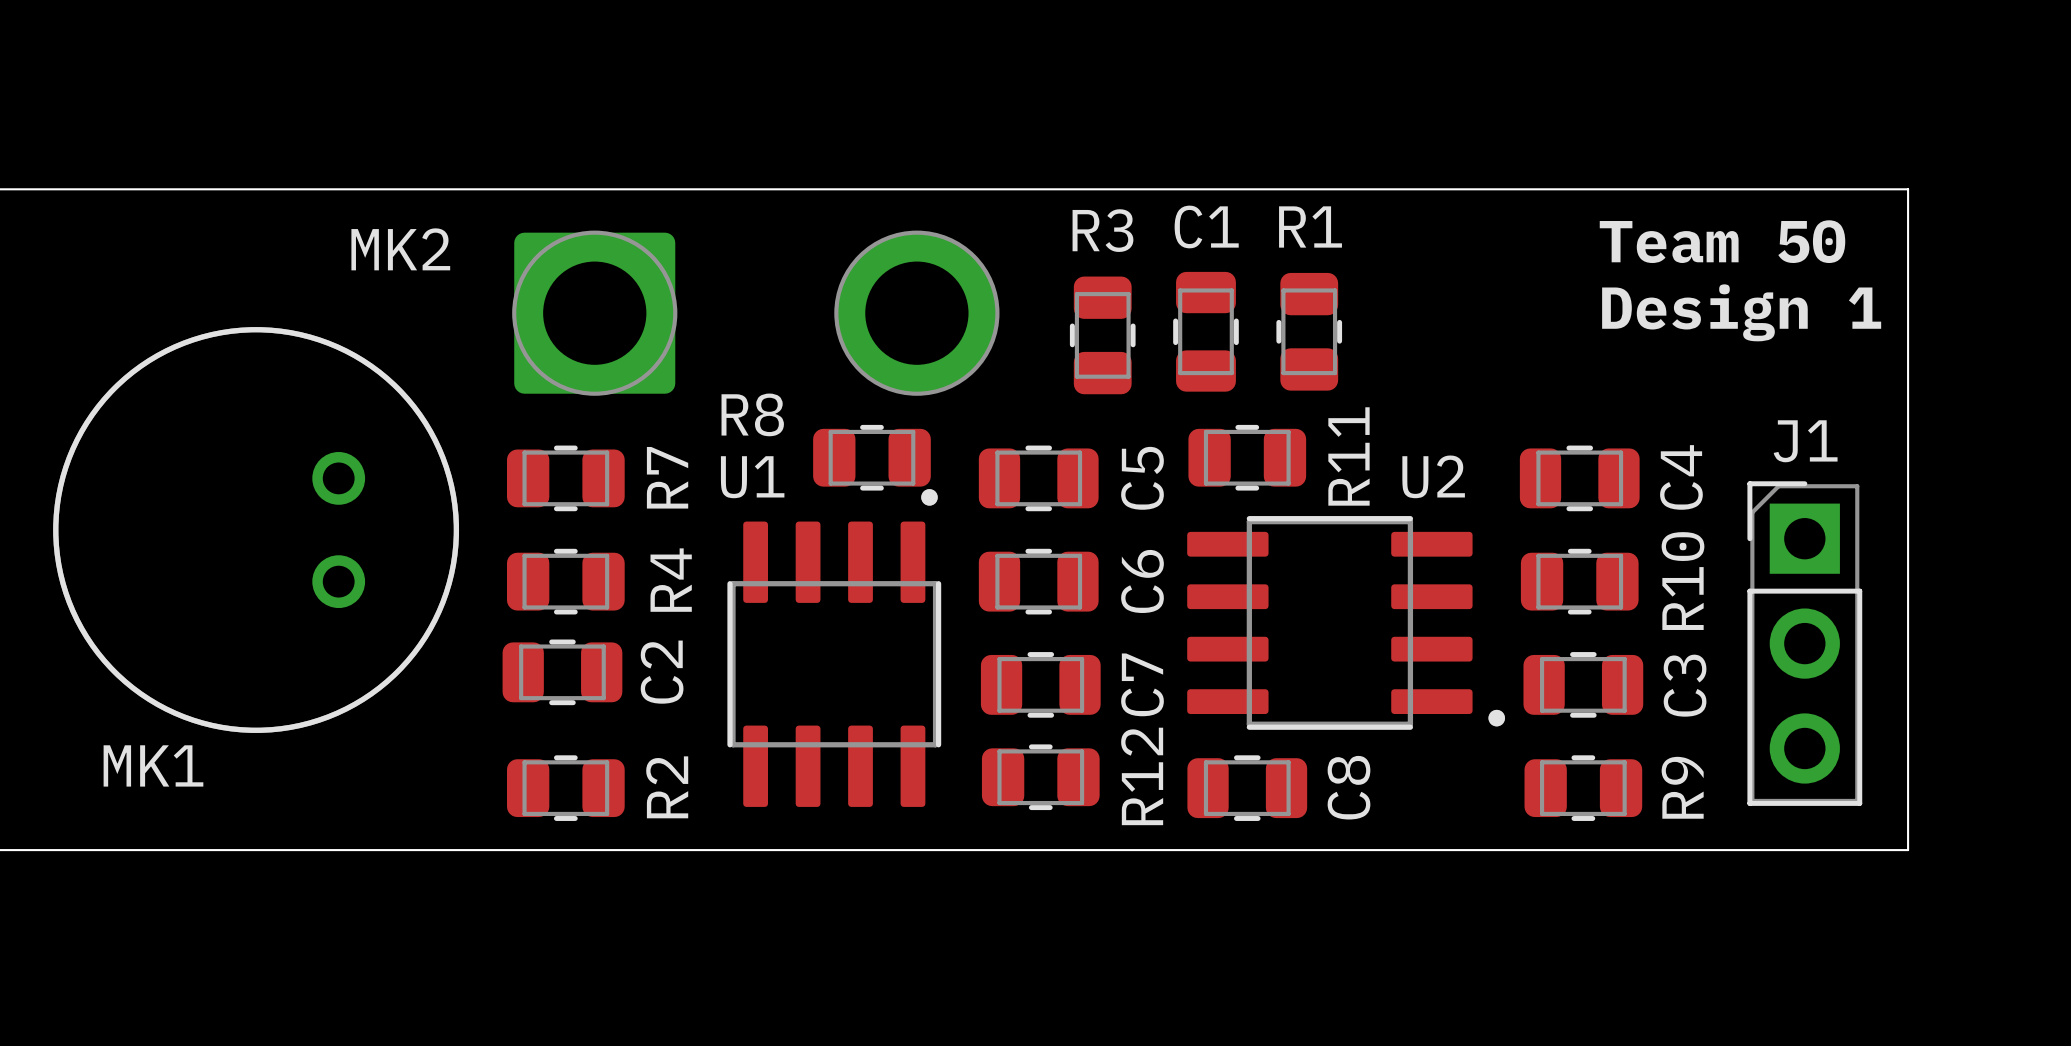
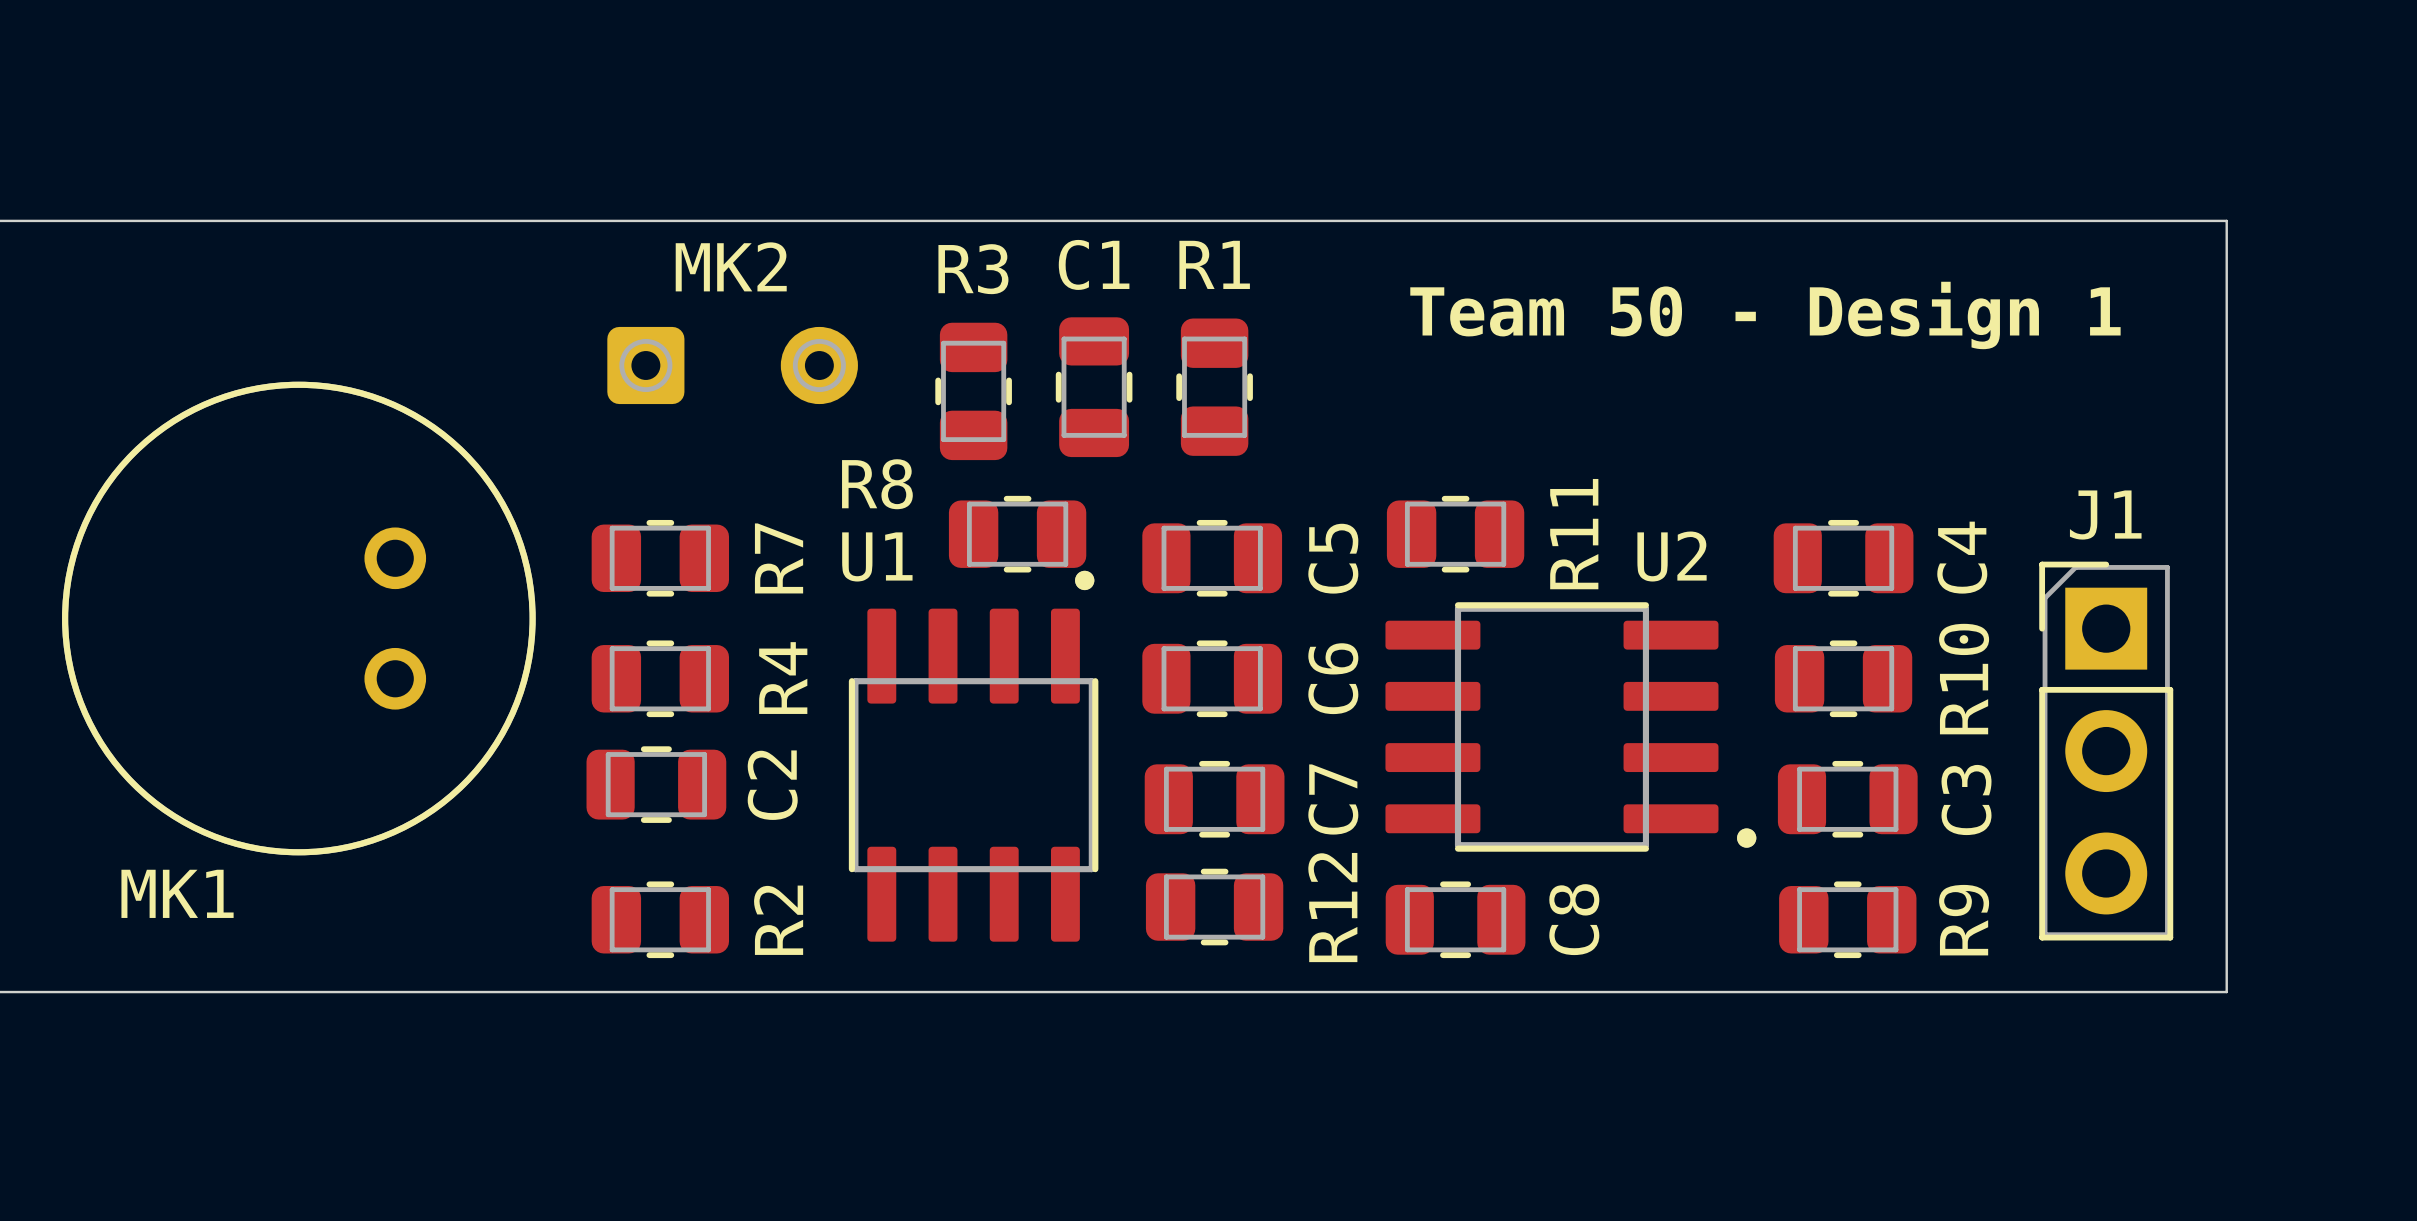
MK2 footprint: [512, 230, 1000, 396] -> [607, 326, 858, 405]
text: Team 50 (1722, 241) -> none
MK2 name position: MK2 (400, 249) -> MK2 (731, 266)
text: Design 1 (1741, 312) -> Team 50 - Design 1 (1765, 315)
C1 position: (1205, 331) -> (1094, 387)
R1 position: (1309, 331) -> (1214, 387)
R3 position: (1102, 335) -> (973, 391)

